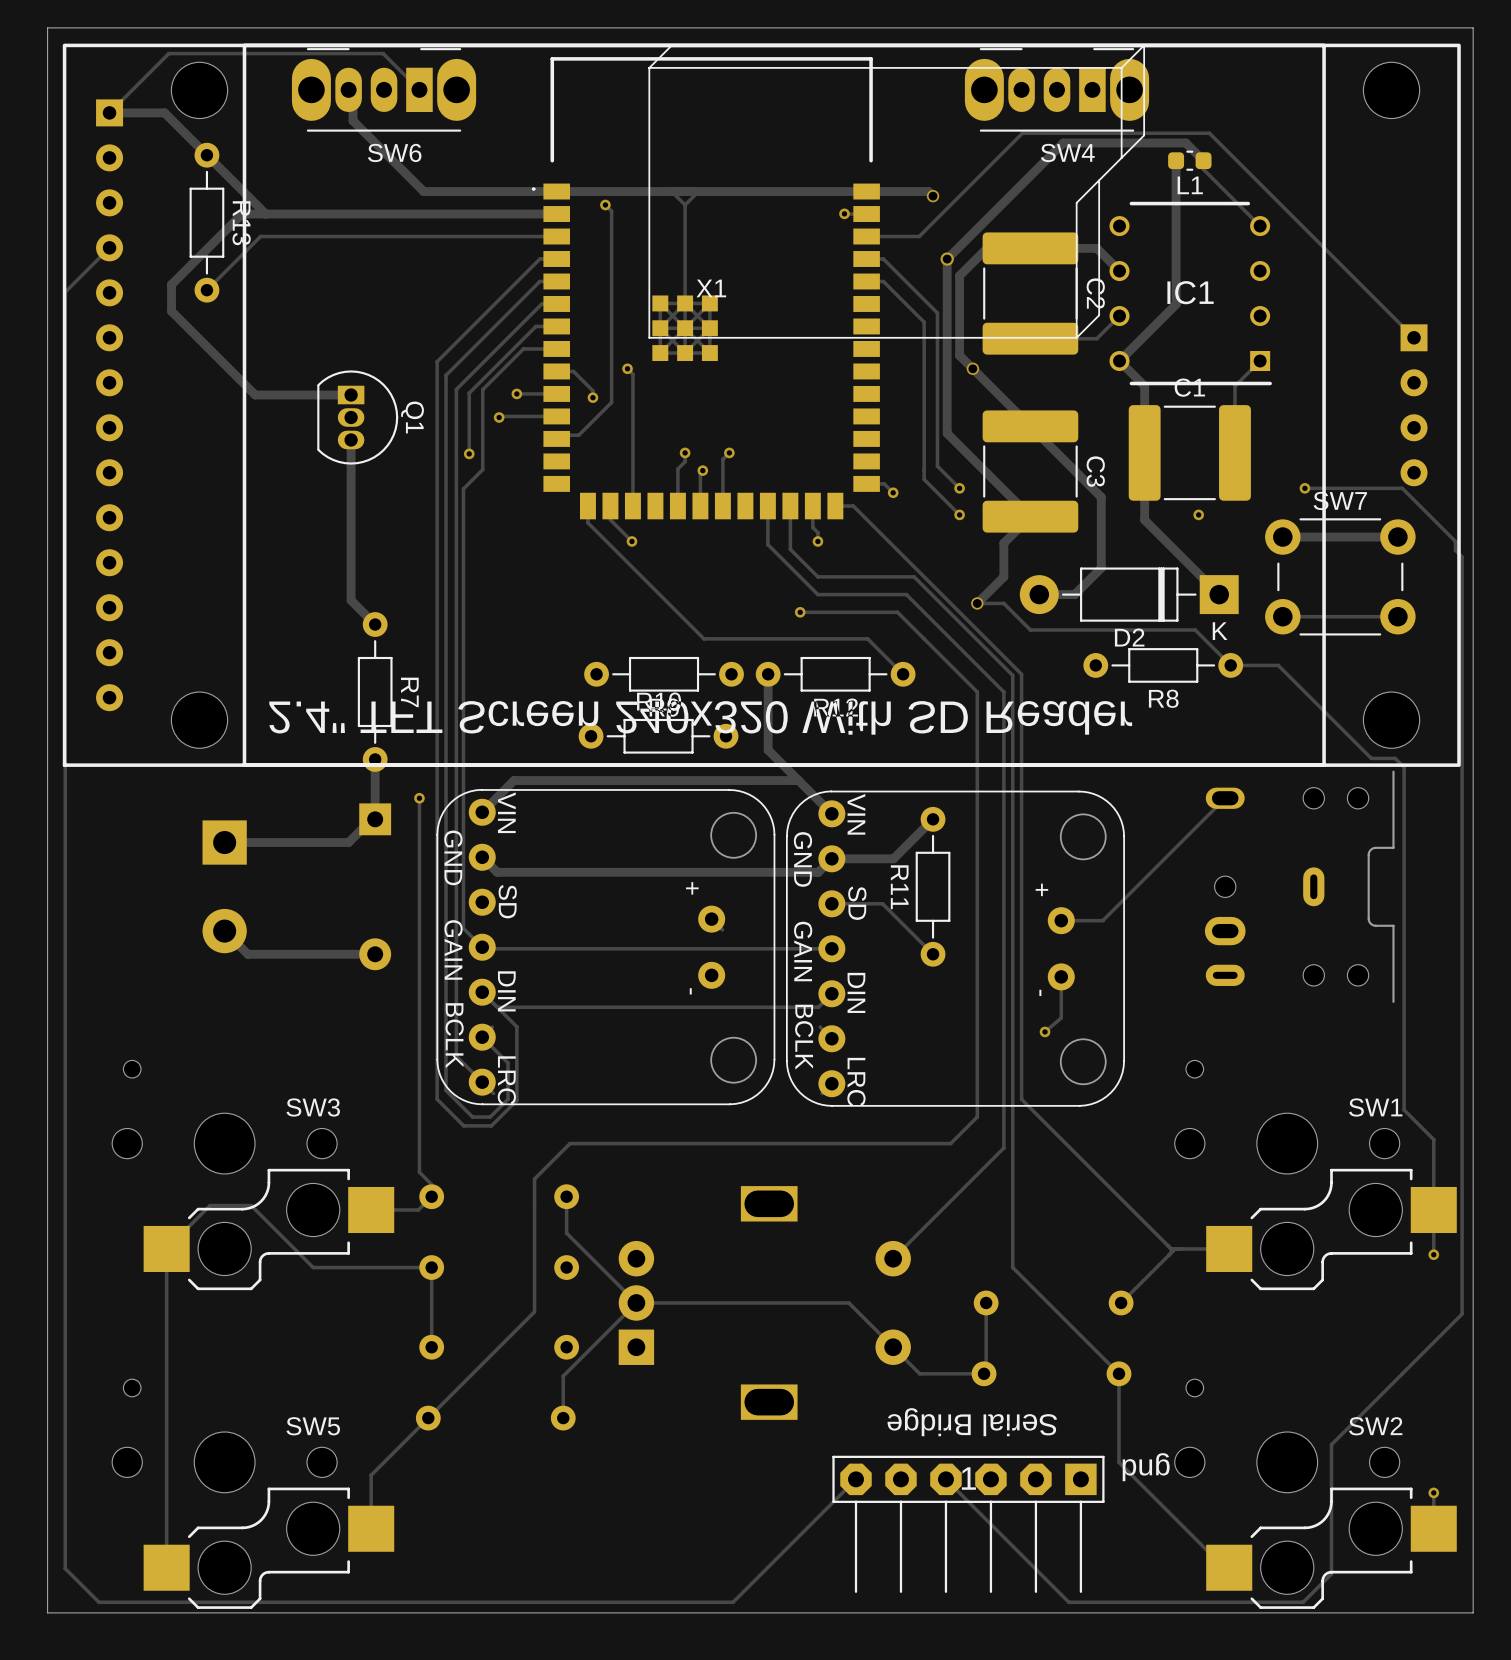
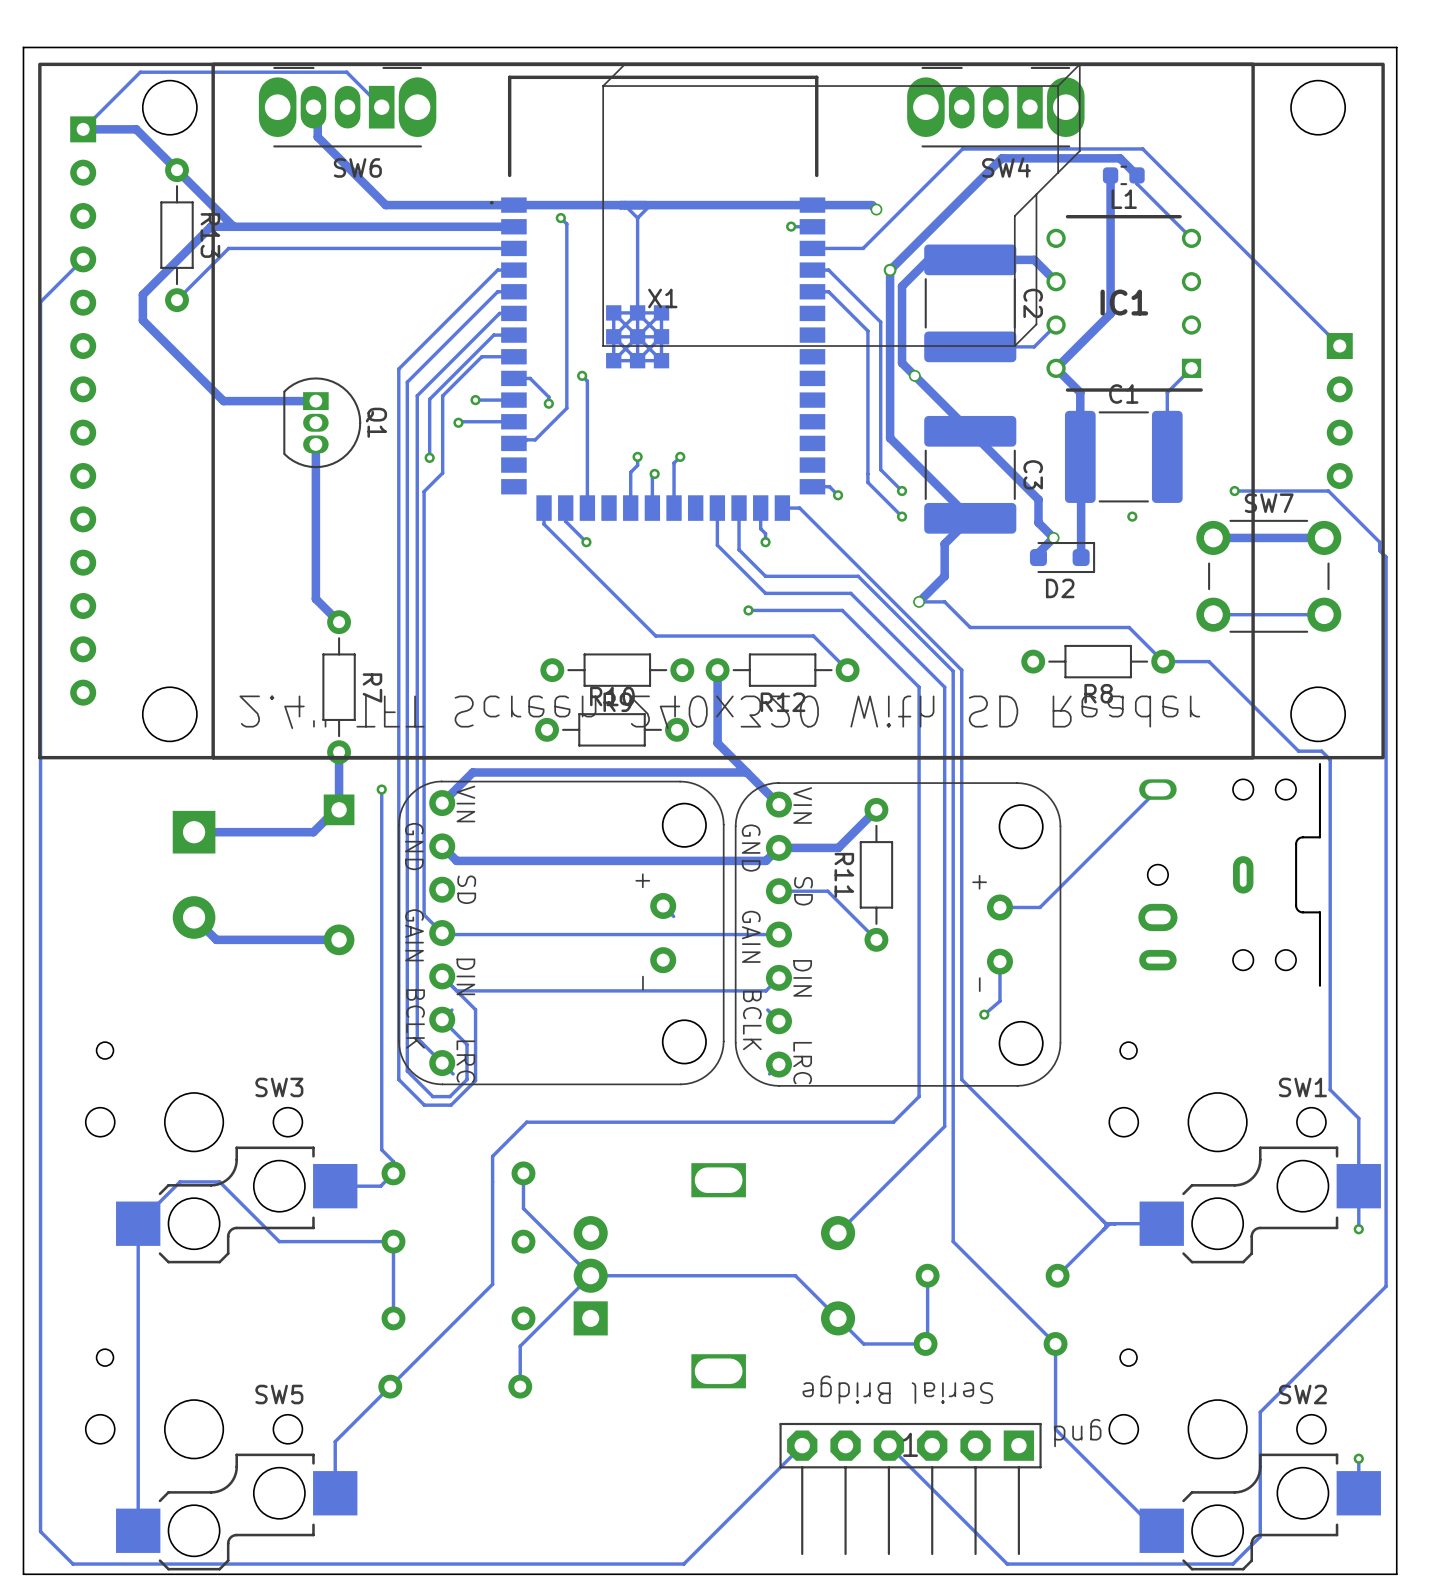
track: (1144, 452) (1144, 520) (1219, 594) -> (1080, 456) (1081, 557)
track: (1101, 521) (1101, 568) (1074, 594) (1039, 594) -> (1038, 522) (1053, 537) (1038, 553)
via: none -> (1053, 537)
D2 footprint: [1019, 567, 1239, 622] -> [1029, 541, 1096, 574]

